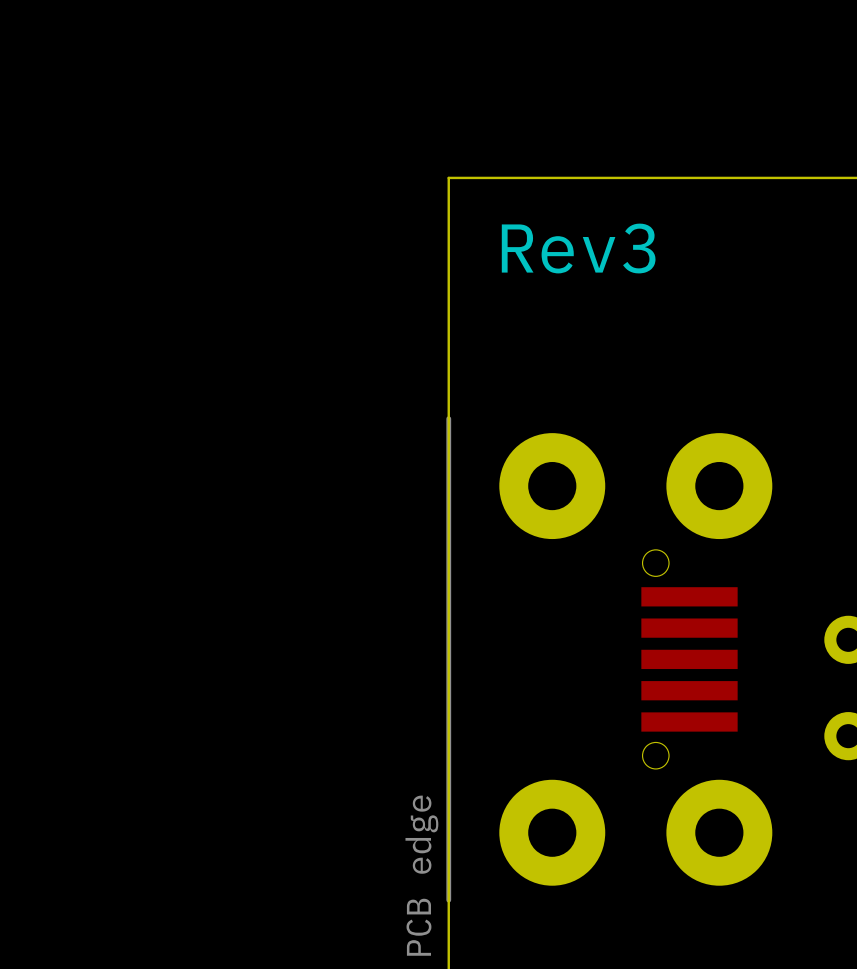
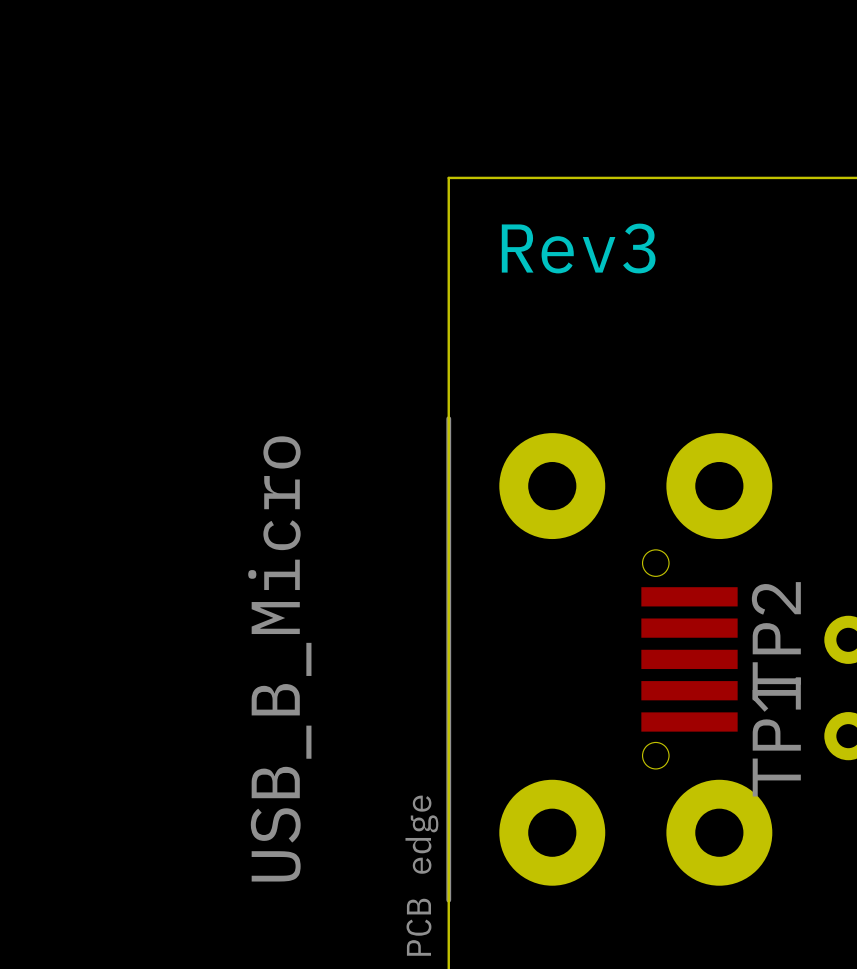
TP2 name: none -> TP2 (776, 641)
part value: none -> USB_B_Micro (279, 658)
TP1 name: none -> TP1 (776, 736)

